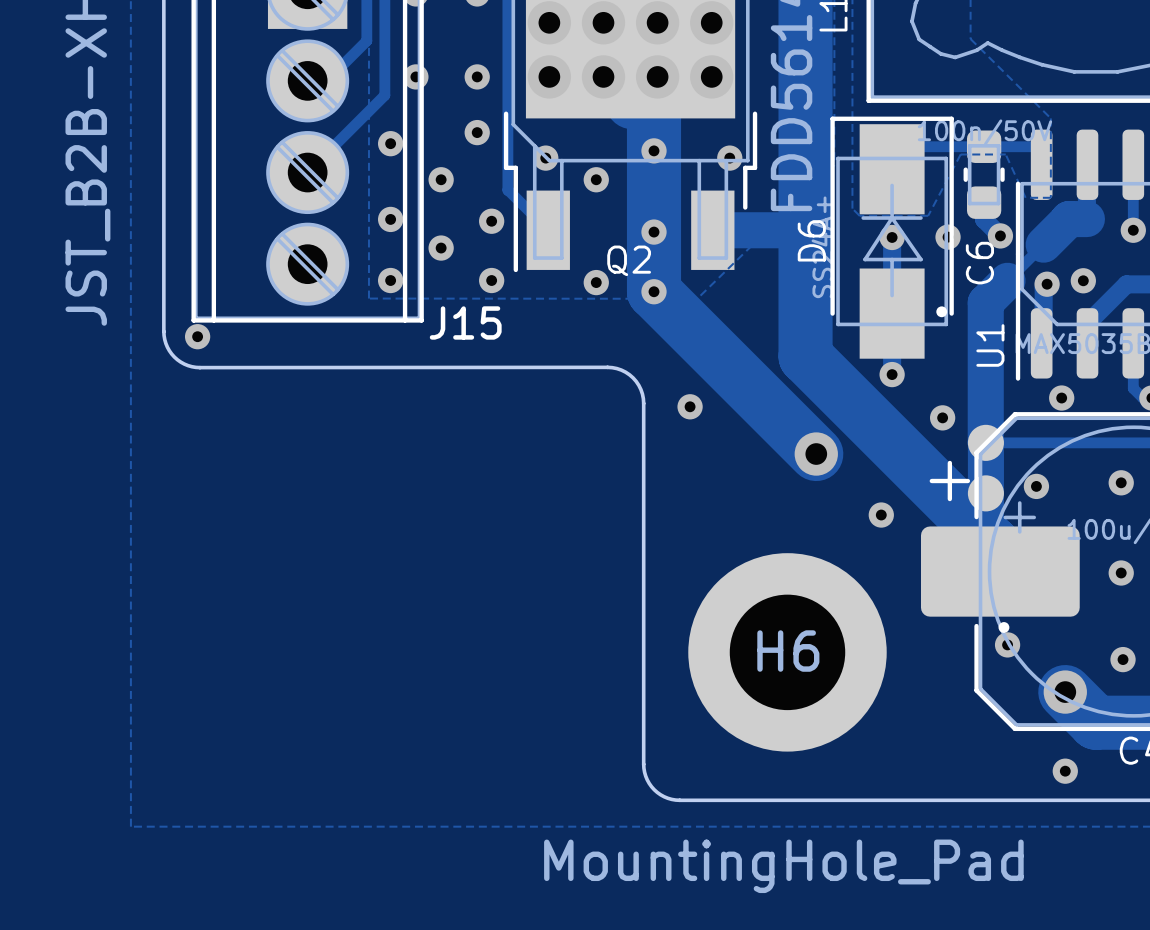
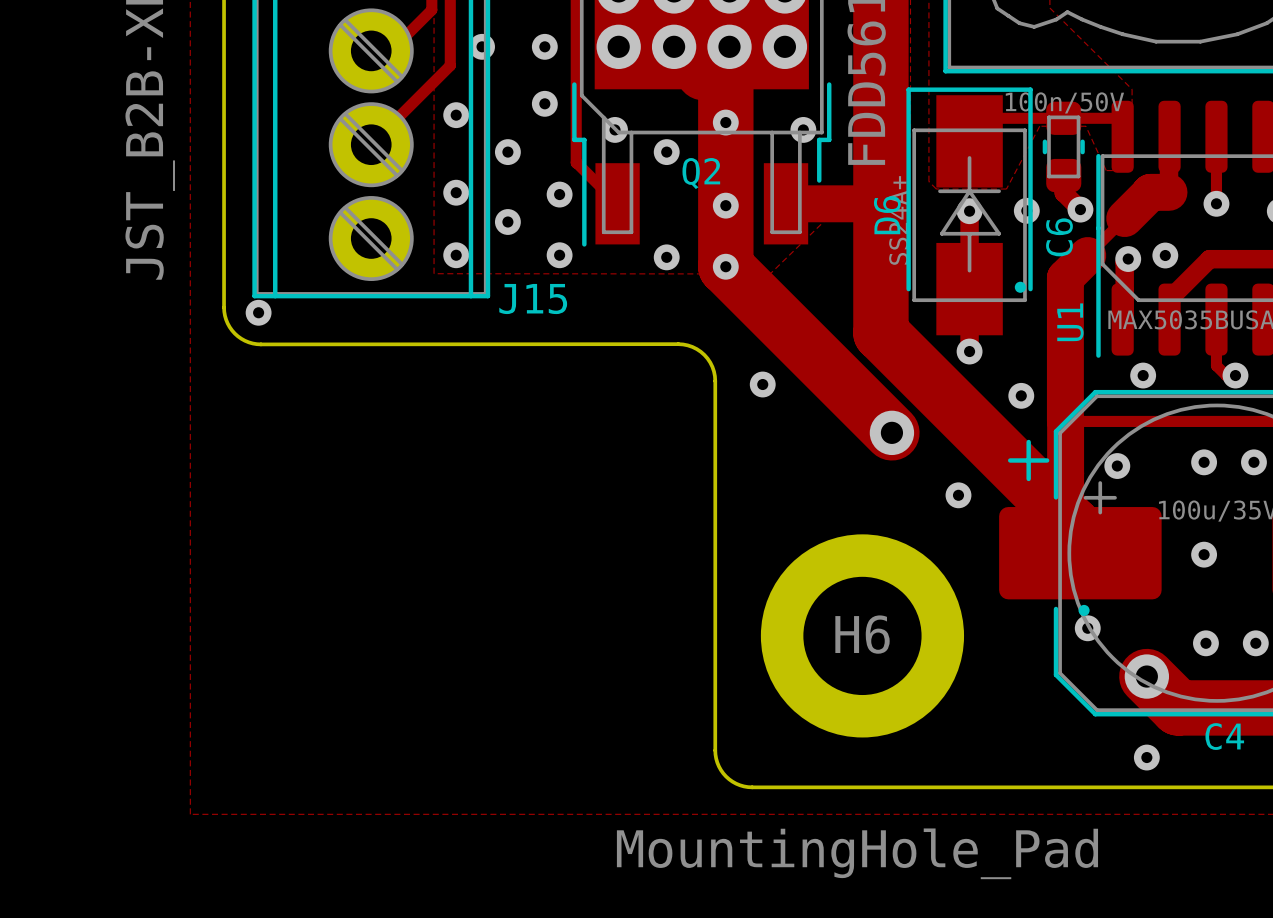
Q2 name position: Q2 (629, 260) -> Q2 (701, 173)

